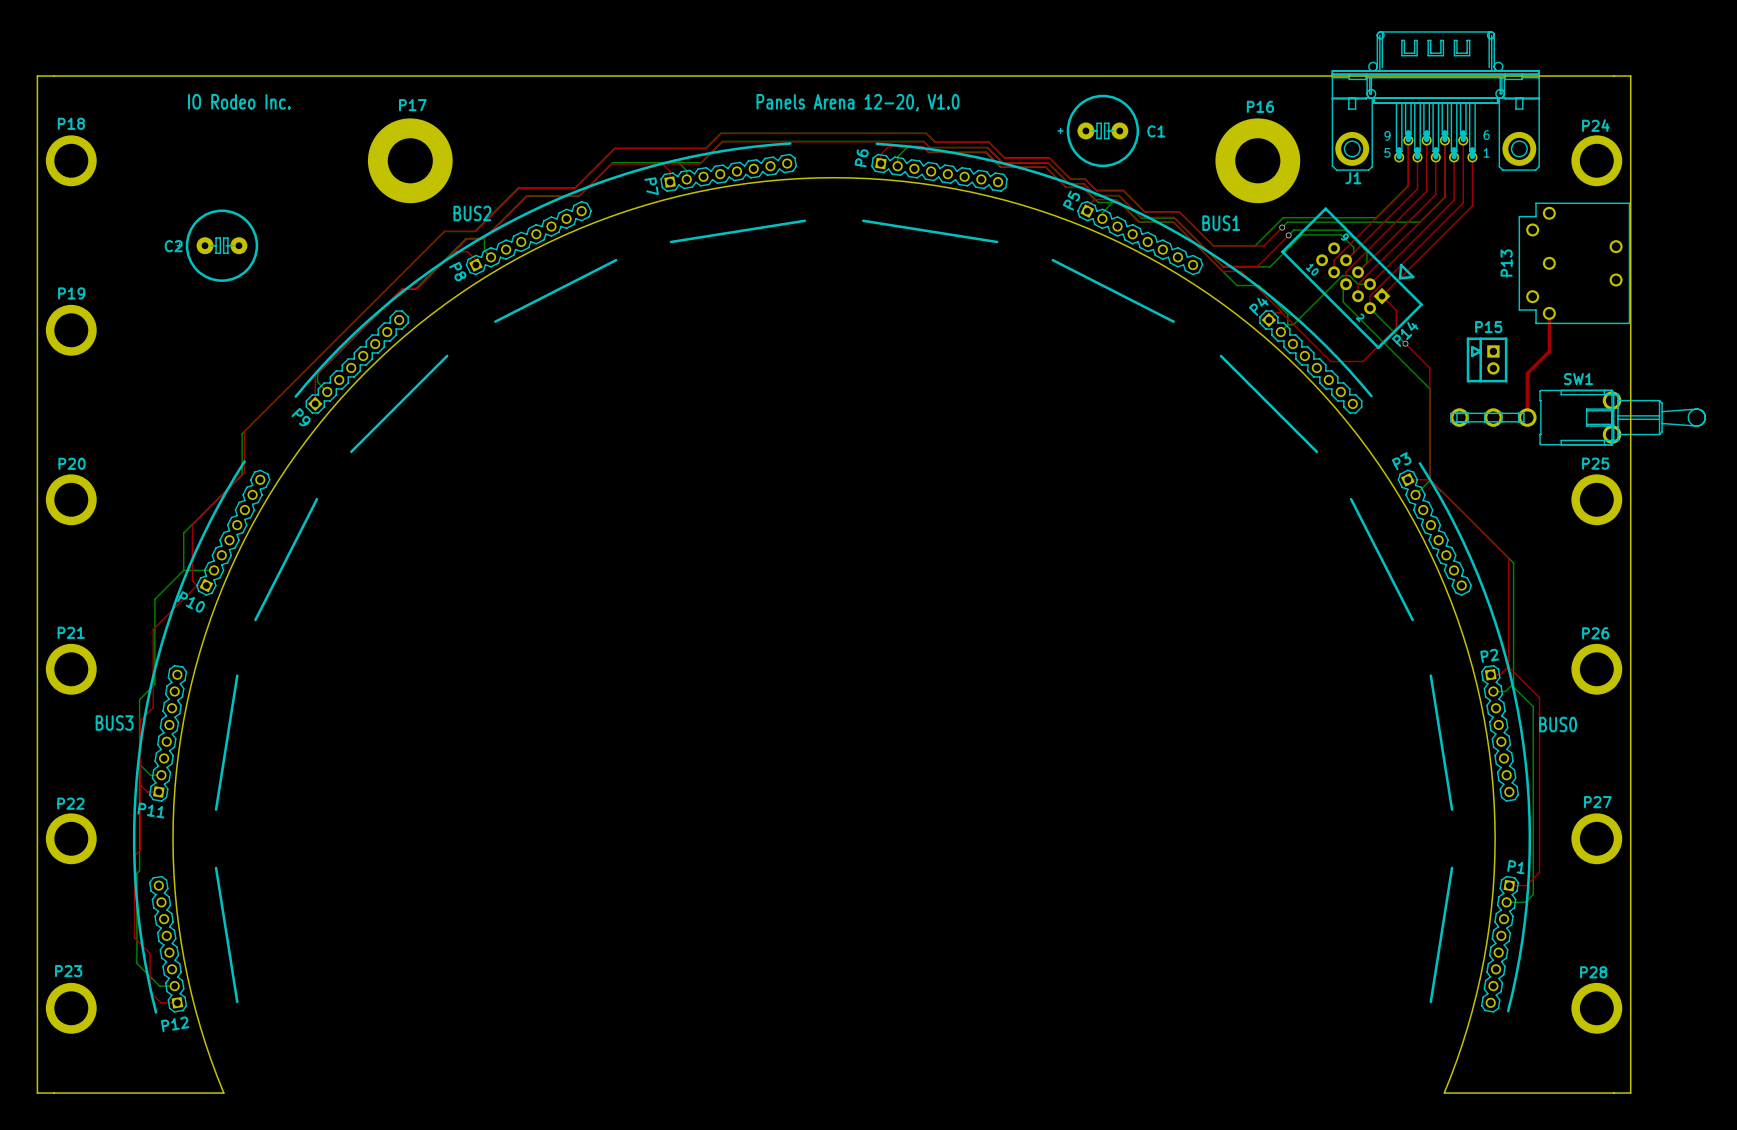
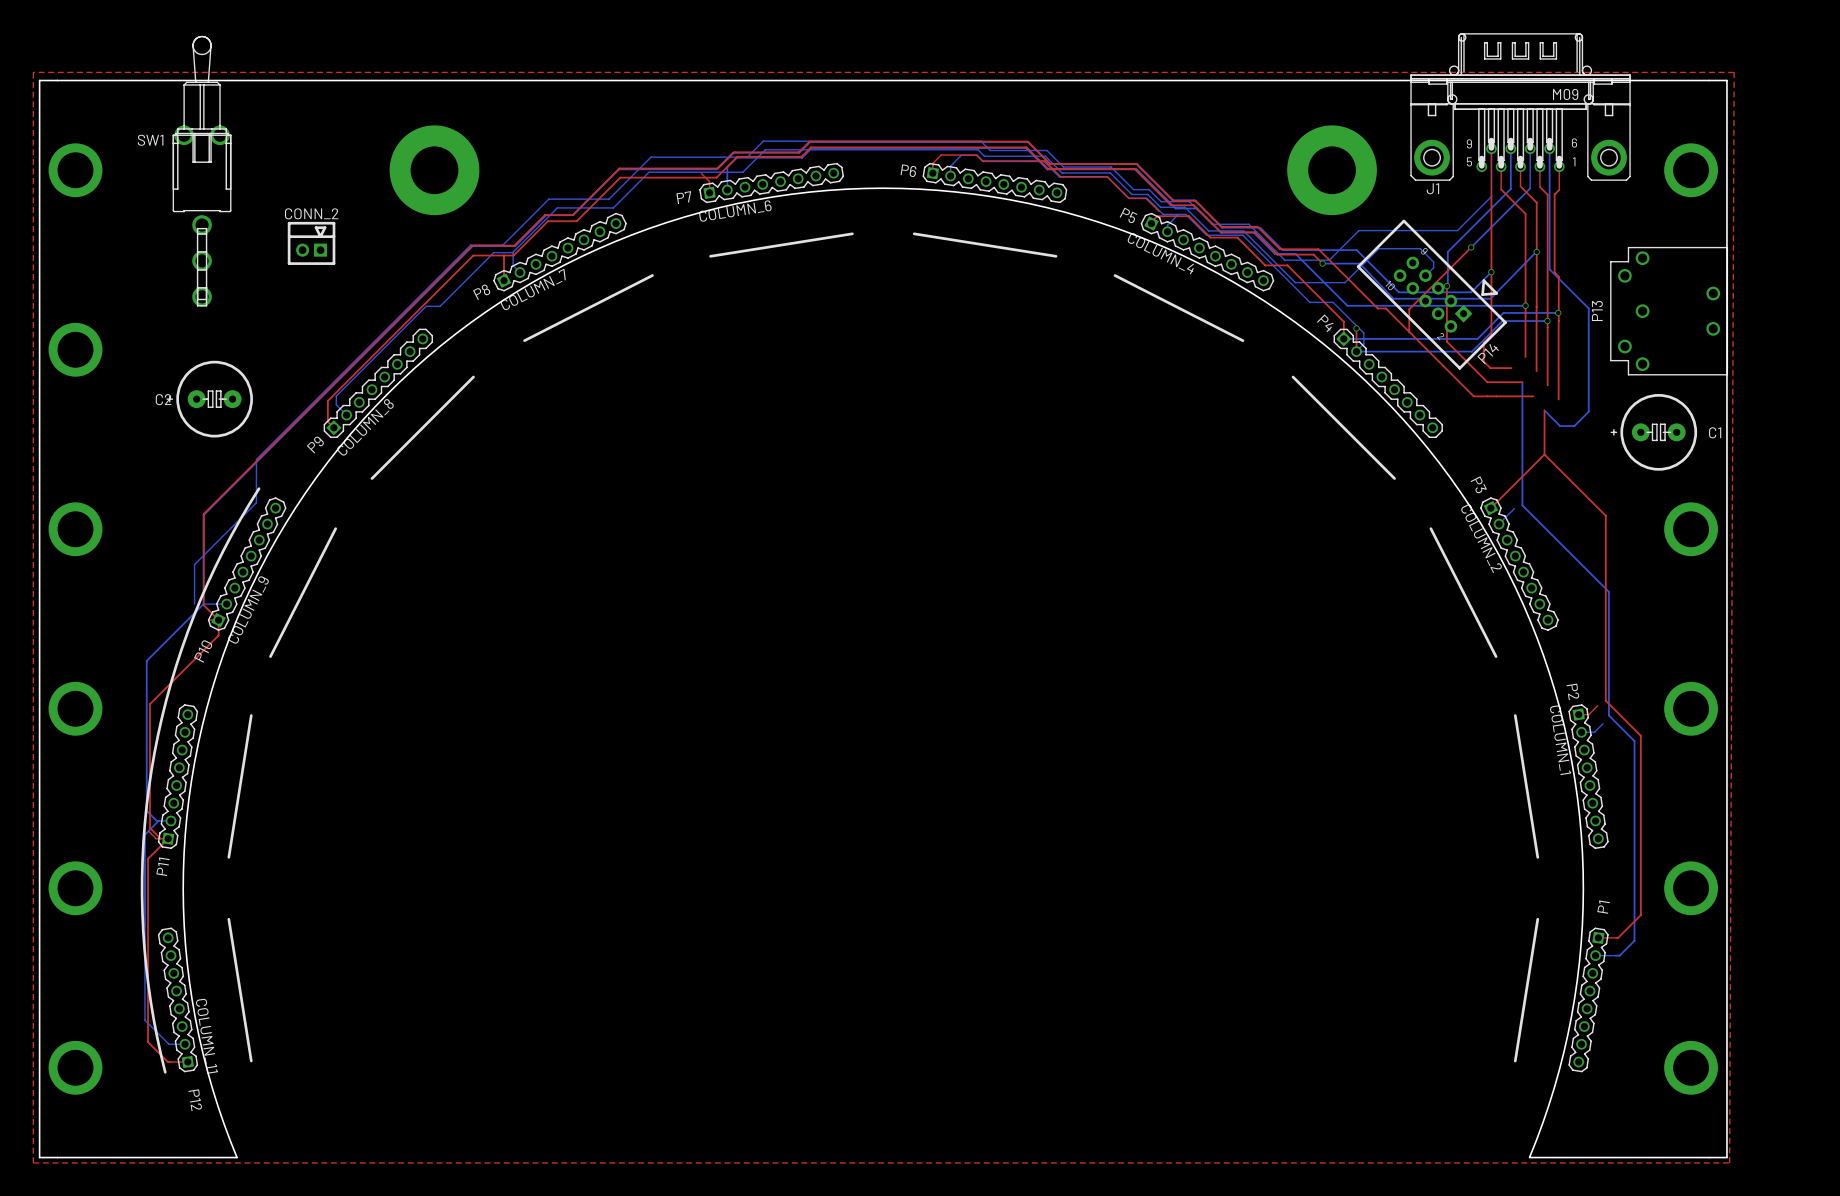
top zone outline: none -> (33, 72) (1734, 72) (1729, 1162) (33, 1162) (33, 72)
J1 text: none -> M09 (1565, 94)
text: IO Rodeo Inc. (239, 101) -> none
text: Panels Arena 12-20, V1.0 (858, 102) -> none
P17 name: P17 (412, 105) -> none
P16 name: P16 (1260, 106) -> none
P18 name: P18 (71, 123) -> none
P24 name: P24 (1595, 125) -> none
C1 position: (1098, 130) -> (1653, 432)
top track: (1426, 140) (1426, 191) (1346, 272) (1346, 284) -> none
bottom track: none -> (1510, 148) (1510, 188) (1447, 251) (1446, 286)
top track: (1444, 140) (1444, 197) (1358, 284) (1358, 296) -> none
top track: (1463, 140) (1463, 202) (1370, 296) (1370, 308) -> none
bottom track: none -> (1549, 148) (1549, 269) (1588, 308) (1588, 411) (1574, 426) (1560, 426) (1544, 410)
line: (790, 143) (723, 150) (657, 164) (577, 190) (516, 218) (458, 252) (403, 290) (352, 334) (295, 396) -> none
line: (876, 143) (960, 154) (1025, 169) (1089, 190) (1150, 218) (1208, 251) (1263, 290) (1314, 334) (1371, 396) -> none
P6 name rotation: 0° (861, 158) -> 90° clockwise (908, 170)
bottom track: (678, 162) (686, 170) -> (1525, 305) (1347, 305) (1295, 253) (1274, 253) (1253, 232) (1221, 232) (1197, 208) (1175, 208) (1136, 169) (1047, 169) (1025, 148) (811, 148) (802, 157) (736, 157) (727, 167) (727, 180)
top track: (1435, 176) (1435, 194) (1358, 272) -> (1520, 186) (1536, 202) (1536, 306)
top track: (1454, 176) (1454, 200) (1370, 284) -> (1539, 186) (1547, 194) (1547, 385)
bottom track: (1444, 177) (1444, 197) (1420, 222) (1287, 222) (1282, 227) -> (1530, 188) (1471, 247)
top track: (1417, 178) (1417, 188) (1346, 260) -> (1501, 189) (1525, 213) (1525, 313)
top track: (1472, 179) (1472, 205) (1382, 296) (1396, 310) (1396, 328) (1362, 361) (1330, 361) (1281, 312) (1276, 312) (1268, 320) -> (1559, 189) (1554, 194) (1554, 272) (1558, 276) (1558, 321)
P7 name rotation: 0° (651, 186) -> 90° counterclockwise (683, 197)
top track: (1408, 186) (1334, 260) (1334, 272) -> (1491, 197) (1491, 334) (1483, 342) (1483, 361) (1490, 368) (1511, 368)
P7 value: none -> COLUMN_6 (735, 211)
P5 name rotation: 0° (1071, 200) -> 90° clockwise (1128, 215)
top track: (1087, 209) (1087, 206) (1094, 199) (1116, 199) (1138, 221) (1172, 221) (1222, 271) (1241, 271) (1281, 312) -> (1151, 221) (1157, 216) (1188, 216) (1210, 237) (1237, 237) (1265, 265) (1287, 265) (1343, 321) (1343, 338)
text: BUS2 (472, 213) -> none
text: BUS1 (1221, 223) -> none
top track: (1282, 227) (1263, 245) (1213, 245) (1179, 211) (1145, 211) (1124, 190) (1096, 190) (1084, 179) (1070, 179) (1049, 158) (1005, 158) (989, 142) (935, 142) (926, 133) (721, 133) (706, 148) (615, 148) (574, 188) (518, 188) (475, 231) (444, 231) (244, 431) (244, 472) (192, 524) -> (1533, 396) (1473, 396) (1385, 308) (1377, 308) (1318, 249) (1279, 249) (1257, 226) (1221, 226) (1195, 200) (1173, 200) (1136, 163) (1050, 163) (1027, 141) (809, 141) (798, 152) (734, 152) (718, 168) (619, 168) (572, 215) (544, 215) (514, 245) (472, 245) (203, 514) (203, 555)
via: (1282, 227) -> none
part: none -> CONN_2 (311, 243)
top track: none -> (1471, 247) (1409, 309) (1409, 331)
via: none -> (1471, 247)
top track: (1288, 235) (1257, 266) (1223, 266) (1174, 217) (1141, 217) (1119, 195) (1095, 195) (1083, 183) (1069, 183) (1048, 162) (1003, 162) (987, 147) (929, 147) (924, 141) (721, 141) (699, 163) (611, 163) (579, 195) (527, 195) (484, 239) (466, 239) (417, 288) (402, 288) (315, 375) (315, 403) -> (1322, 263) (1313, 254) (1277, 254) (1254, 232) (1220, 232) (1193, 205) (1170, 205) (1134, 168) (1047, 168) (1026, 147) (811, 147) (801, 156) (737, 156) (716, 177) (620, 177) (576, 221) (547, 221) (513, 255) (473, 255) (327, 400) (327, 421) (333, 427)
bottom track: (1288, 235) (1293, 230) (1345, 230) (1366, 251) (1366, 262) (1358, 272) -> none
via: (1288, 235) -> none
bottom track: none -> (1536, 251) (1490, 298) (1393, 298) (1359, 263) (1322, 263)
via: none -> (1536, 251)
P5 value: none -> COLUMN_4 (1160, 253)
C2 position: (217, 245) -> (209, 399)
via: none -> (1322, 263)
top track: (454, 251) (467, 251) (475, 259) -> (504, 255) (504, 275)
via: none -> (1491, 272)
P13 position: (1574, 263) -> (1669, 311)
top track: none -> (1446, 286) (1446, 341) (1487, 382) (1522, 382)
via: none -> (1446, 286)
P8 name rotation: 0° (457, 271) -> 90° counterclockwise (481, 292)
P8 value: none -> COLUMN_7 (533, 289)
bottom track: (1346, 284) (1343, 287) (1343, 302) (1430, 388) (1430, 480) (1513, 563) (1513, 687) (1533, 706) (1533, 894) (1525, 902) -> (1522, 382) (1522, 505) (1608, 591) (1608, 715) (1634, 741) (1634, 940) (1619, 955) (1615, 955)
bottom track: (1370, 284) (1358, 284) (1349, 275) (1342, 275) (1293, 324) (1287, 324) -> none
via: none -> (1525, 305)
top track: none -> (1536, 306) (1536, 371)
P19 name: P19 (71, 293) -> none
bottom track: none -> (1558, 312) (1503, 312) (1477, 338) (1343, 338)
via: none -> (1558, 312)
top track: none -> (1525, 313) (1525, 357)
bottom track: none -> (1547, 321) (1502, 321) (1472, 351) (1356, 351)
via: none -> (1547, 321)
top track: none -> (1558, 321) (1558, 399)
P4 name rotation: 0° (1258, 306) -> 90° clockwise (1325, 323)
bottom track: (1370, 308) (1405, 343) -> none
top track: none -> (1356, 328) (1356, 351)
via: none -> (1356, 328)
top track: (1549, 313) (1549, 351) (1527, 373) (1527, 417) -> none
top track: (1405, 343) (1429, 368) (1429, 479) -> none
via: (1405, 343) -> none
P15: (1487, 359) -> none
SW1 name position: SW1 (1578, 379) -> SW1 (150, 140)
top track: none -> (1544, 410) (1544, 454)
P9 value: none -> COLUMN_8 (365, 427)
P9 name rotation: 0° (301, 417) -> 90° counterclockwise (315, 445)
SW1 rotation: 0° (1578, 417) -> 90° counterclockwise (202, 171)
SW1 position: (1578, 417) -> (202, 171)
top track: none -> (1544, 454) (1490, 508)
P3 name rotation: 0° (1401, 461) -> 90° clockwise (1478, 484)
P20 name: P20 (72, 463) -> none
line: (1419, 463) (1455, 525) (1484, 590) (1506, 658) (1520, 728) (1528, 798) (1529, 870) (1522, 941) (1508, 1011) -> none
P25 name: P25 (1595, 463) -> none
top track: (1407, 479) (1430, 479) (1508, 558) (1508, 666) (1539, 697) (1539, 872) (1526, 885) -> (1544, 454) (1605, 515) (1605, 700) (1640, 735) (1640, 915) (1616, 937)
P3 value: none -> COLUMN_2 (1481, 538)
bottom track: (192, 570) (183, 570) (154, 599) (154, 684) (139, 699) (139, 870) (136, 873) -> (158, 820) (144, 834) (144, 925)
top track: (192, 571) (192, 580) (197, 585) (153, 629) (153, 707) (140, 720) (140, 850) (134, 856) (134, 937) (150, 953) (150, 992) (160, 1002) -> (203, 605) (218, 620) (218, 635) (150, 704) (150, 827) (160, 838)
P10 value: none -> COLUMN_9 (248, 609)
P10 name rotation: 0° (191, 601) -> 90° counterclockwise (203, 651)
P21 name: P21 (71, 632) -> none
P26 name: P26 (1595, 633) -> none
P2 name rotation: 0° (1489, 655) -> 90° clockwise (1572, 691)
P2 value: none -> COLUMN_1 (1560, 740)
text: BUS3 (114, 723) -> none
text: BUS0 (1558, 724) -> none
bottom track: (139, 764) (150, 775) -> (1491, 272) (1471, 292) (1398, 292) (1356, 250) (1282, 250) (1260, 227) (1222, 227) (1194, 200) (1173, 200) (1136, 163) (1050, 163) (1028, 141) (810, 141) (799, 152) (732, 152) (716, 169) (618, 169) (573, 215) (546, 215) (515, 246) (472, 246) (203, 515) (203, 604) (146, 660) (146, 810) (156, 820) (159, 820)
top track: none -> (168, 838) (148, 858) (148, 1042) (167, 1062) (170, 1062)
P27 name: P27 (1597, 802) -> none
P22 name: P22 (70, 803) -> none
P11 name rotation: 0° (150, 810) -> 90° counterclockwise (163, 866)
P1 name rotation: 0° (1515, 867) -> 90° counterclockwise (1603, 907)
P23 name: P23 (68, 971) -> none
P28 name: P28 (1593, 972) -> none
P12 value: none -> COLUMN_11 (206, 1036)
P12 name rotation: 0° (175, 1024) -> 90° clockwise (195, 1100)

